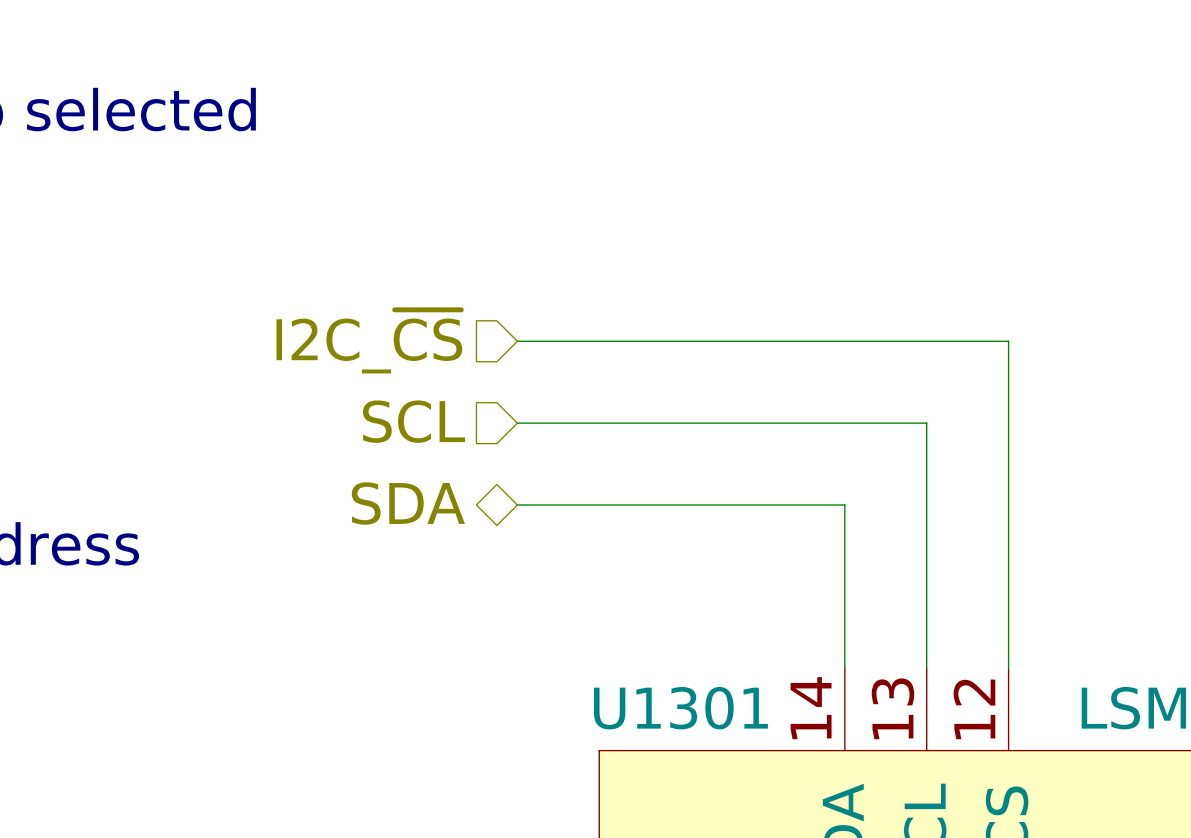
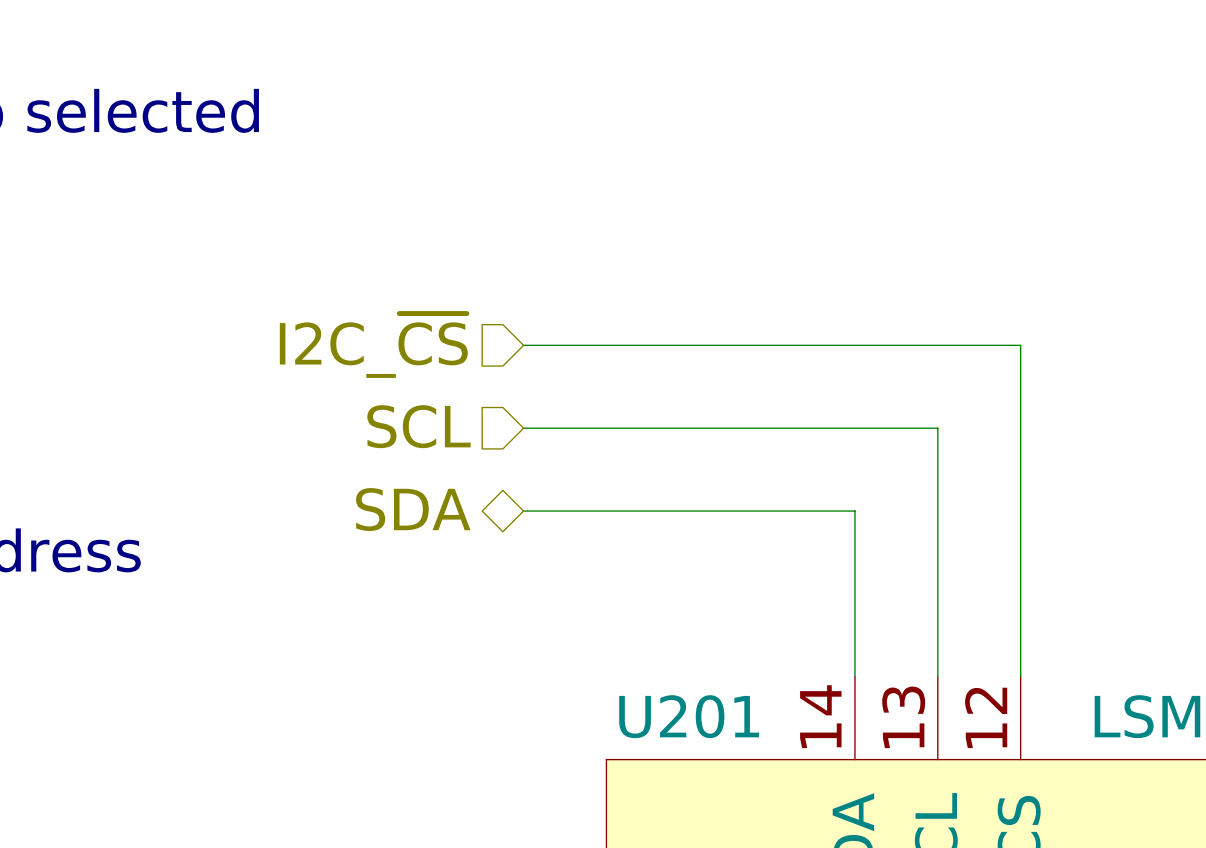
U1301 name: U1301 (680, 708) -> U201 (689, 716)

